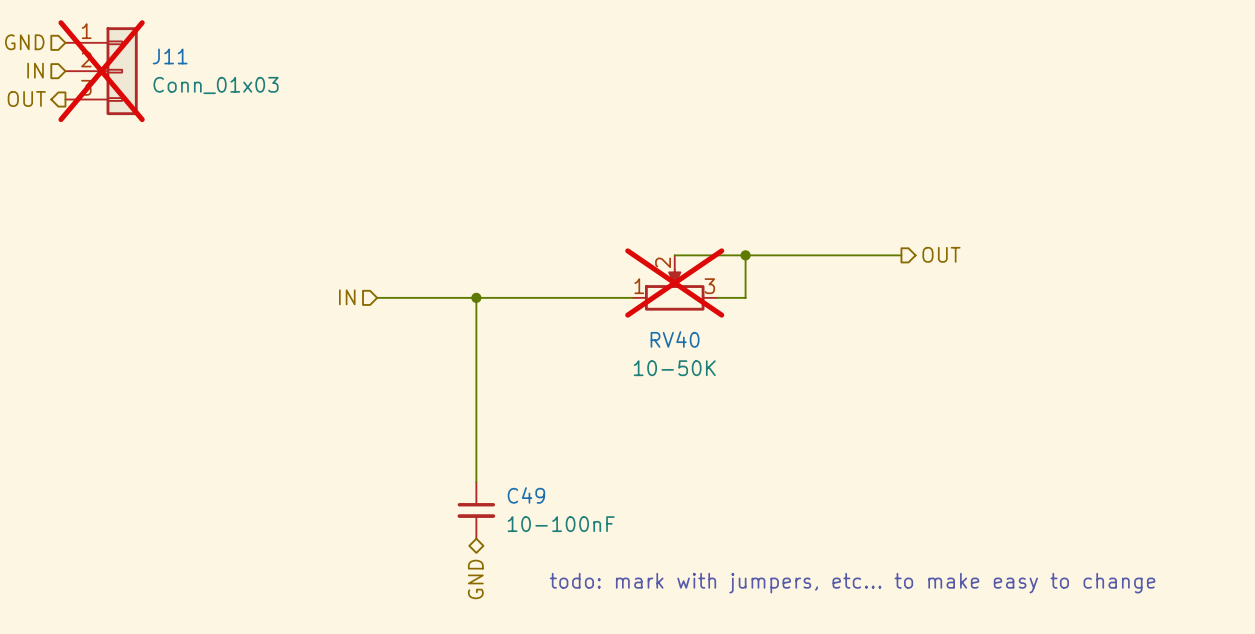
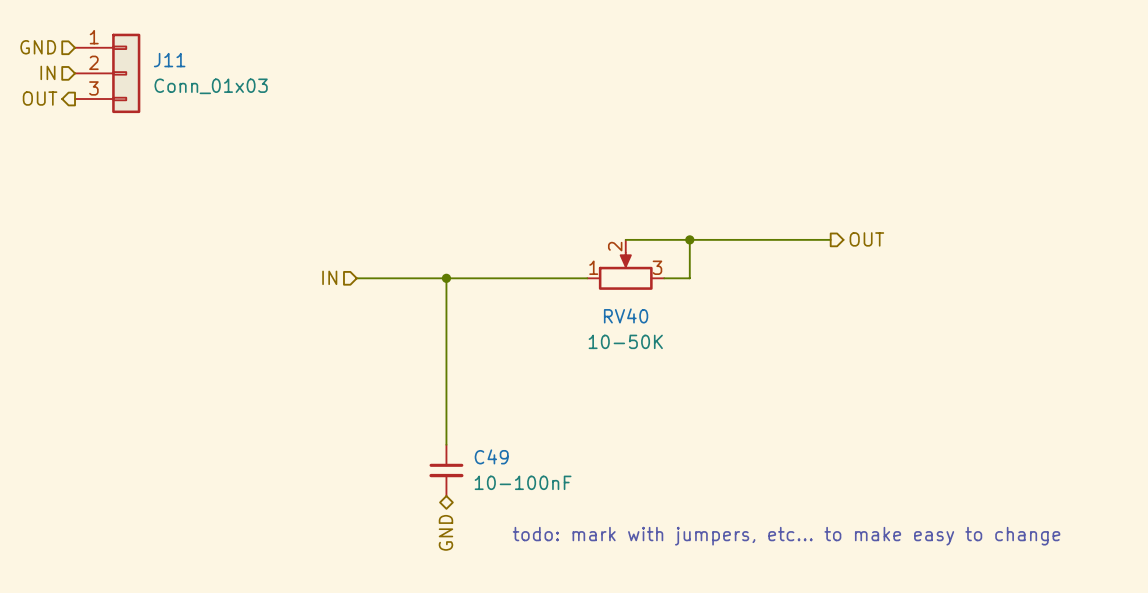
J11 do-not-place cross: (101, 71) -> none
RV40 do-not-place cross: (674, 282) -> none

